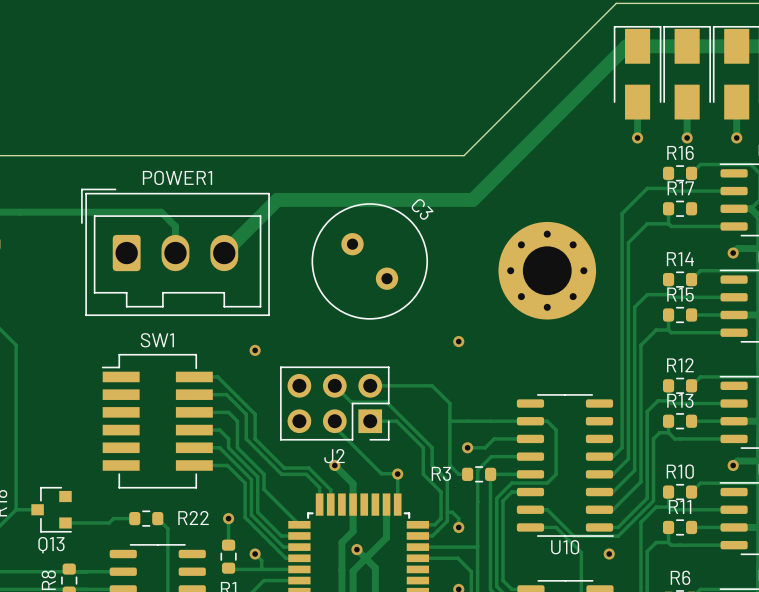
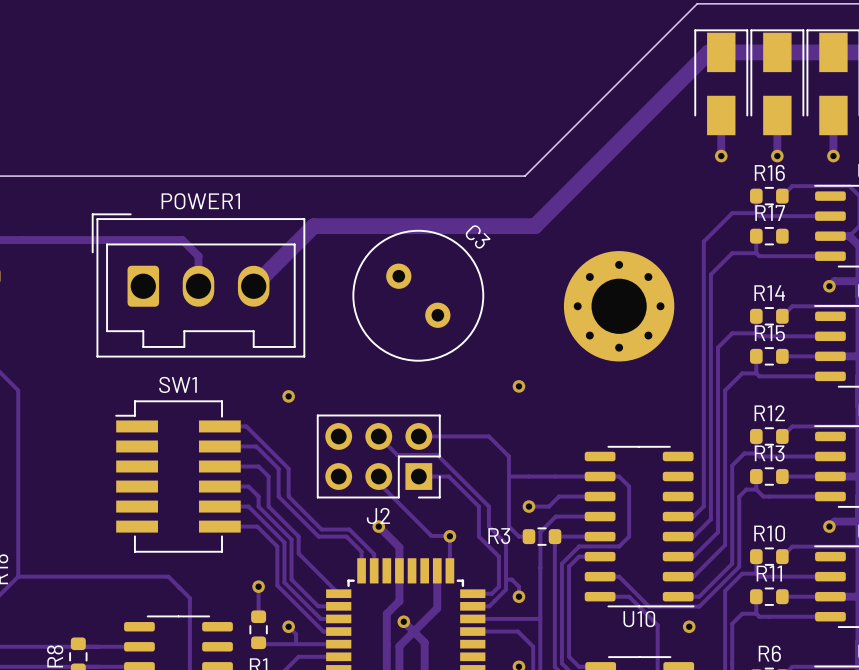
track: none -> (42, 576) (168, 576) (178, 586)
Q13: (51, 509) -> none
track: (134, 518) (113, 518) (109, 522) (65, 522) -> none
R22: (146, 518) -> none

